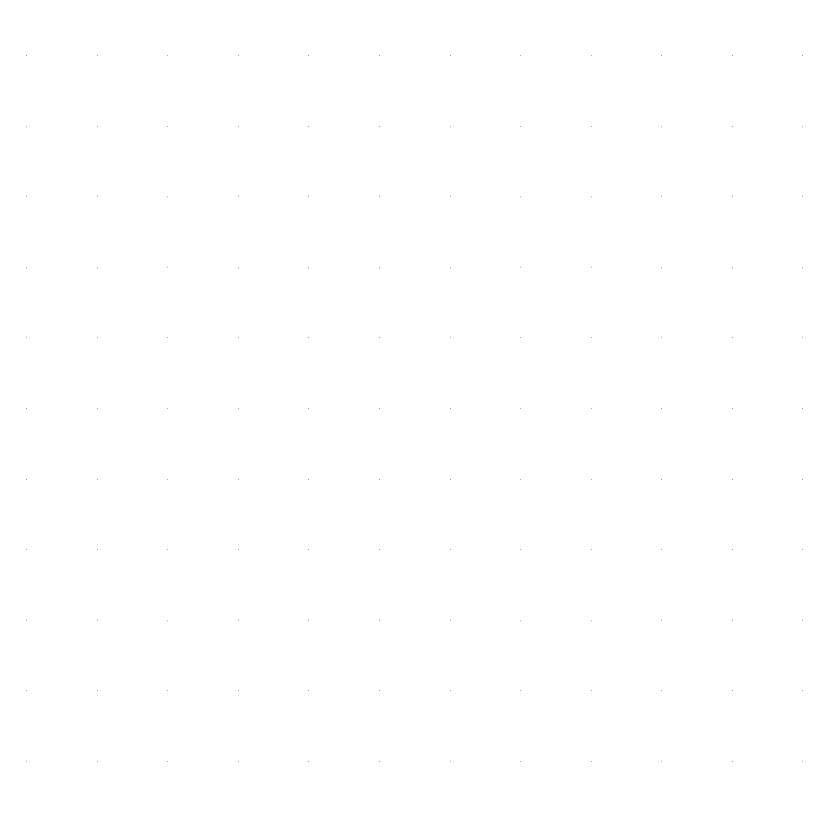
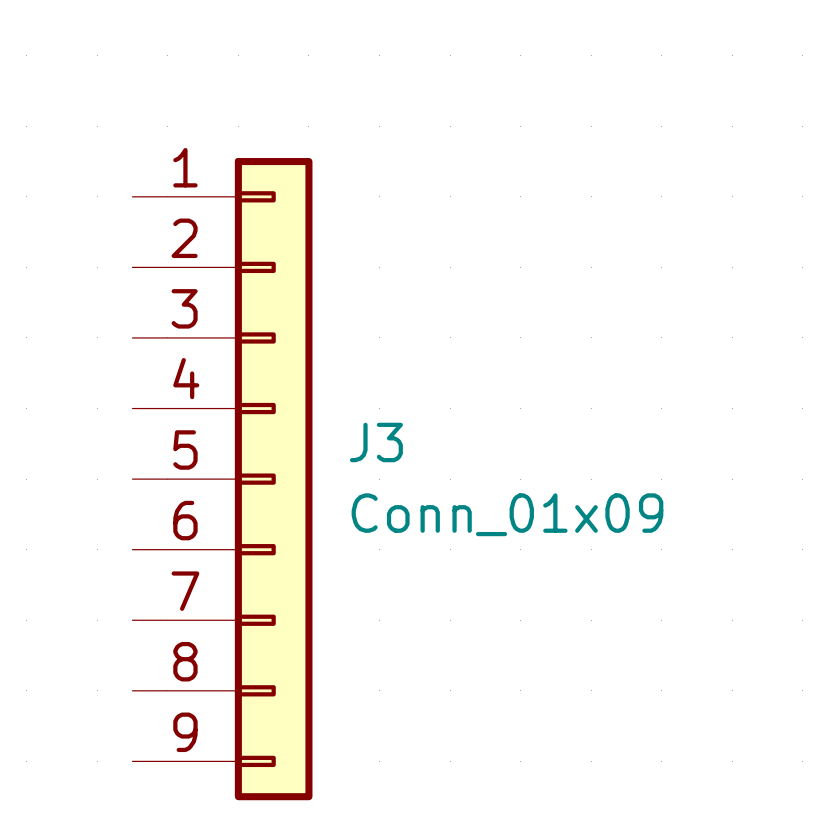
J3: none -> Conn_01x09 (222, 479)

